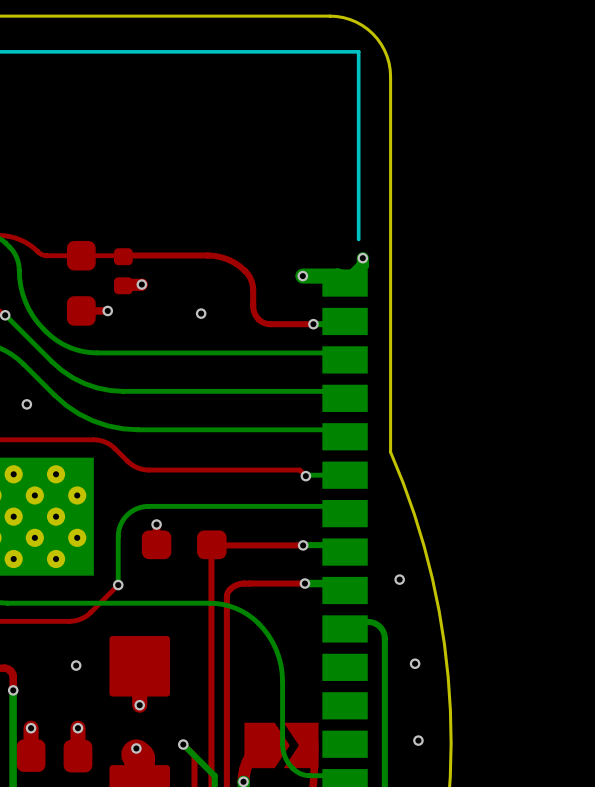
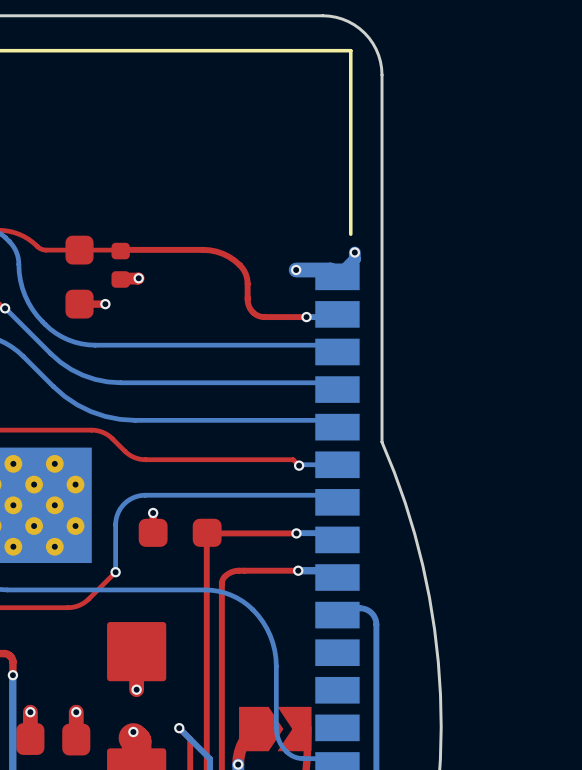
via: (201, 313) -> none
via: (26, 404) -> none
via: (399, 579) -> none
via: (415, 663) -> none
via: (76, 665) -> none
via: (418, 740) -> none

